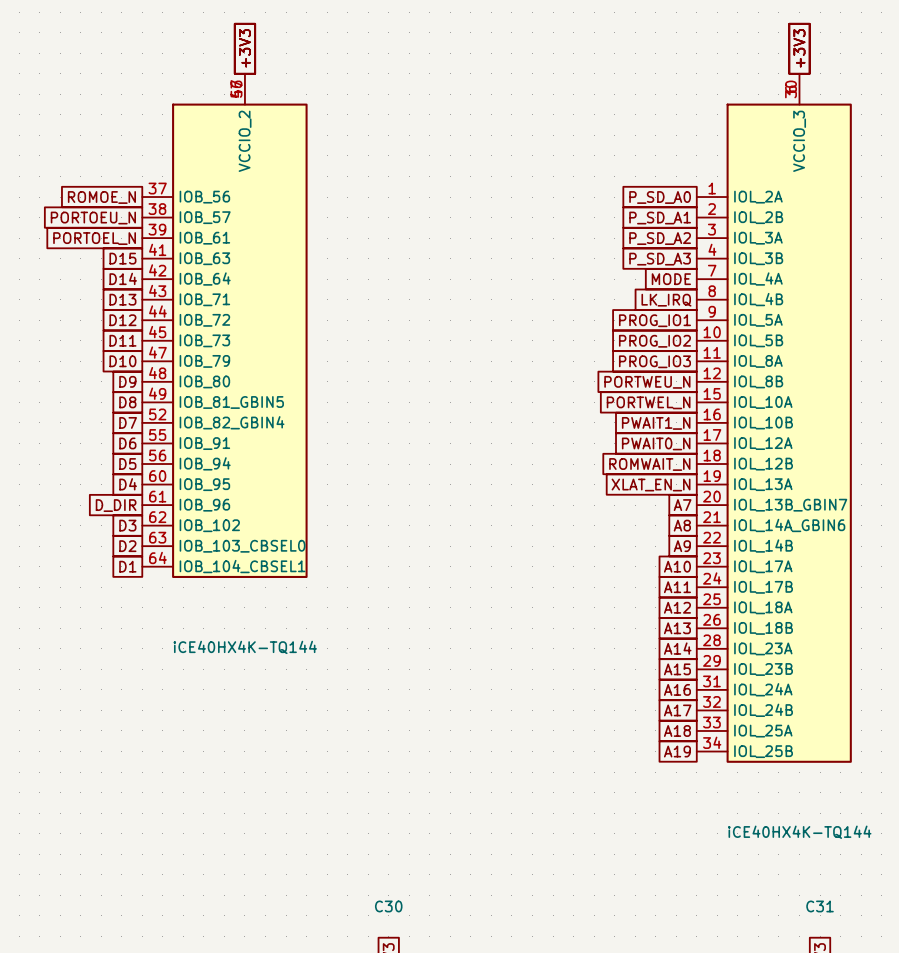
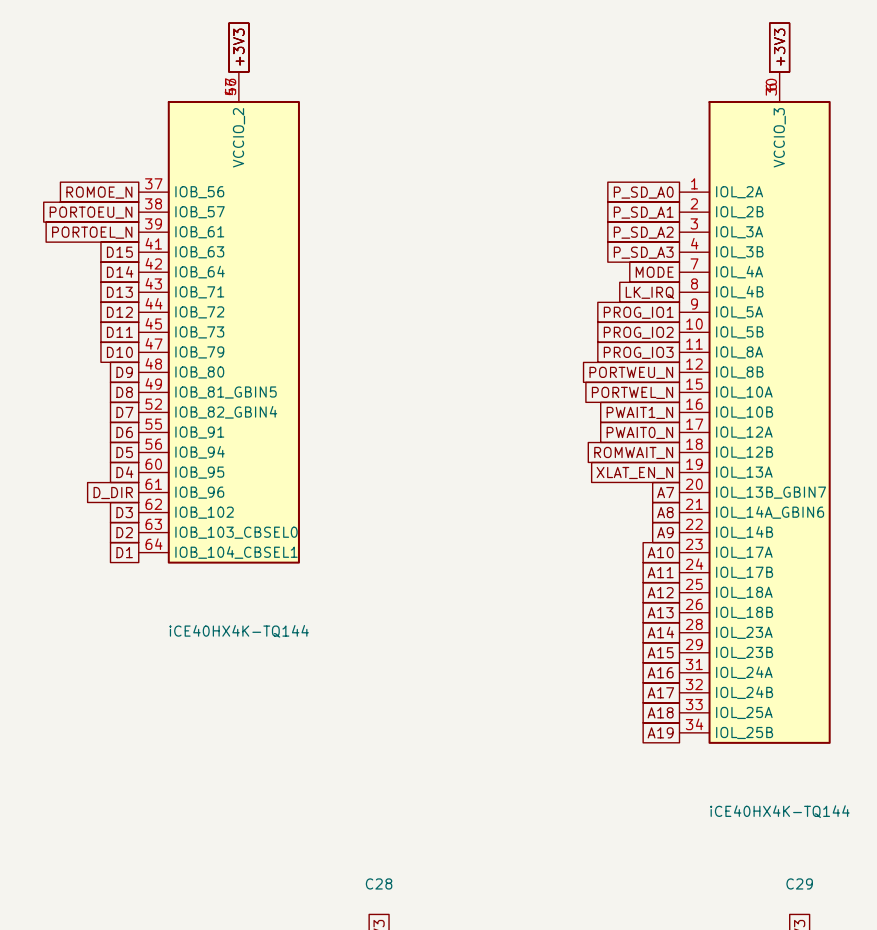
C30 name: C30 (388, 906) -> C28 (379, 883)
C31 name: C31 (820, 906) -> C29 (799, 883)

